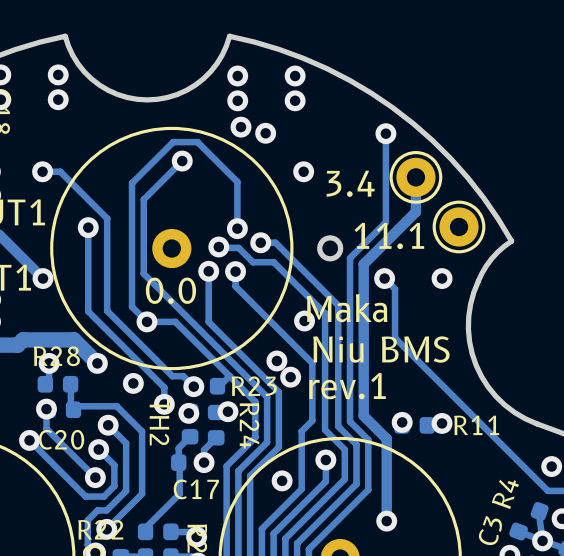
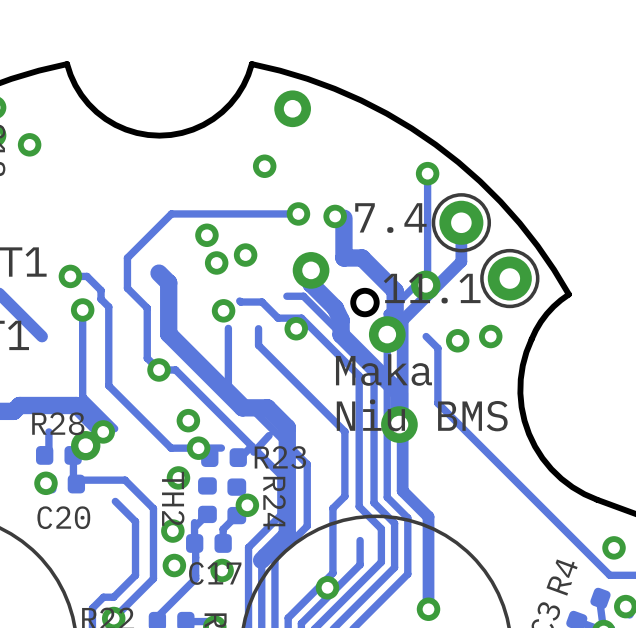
via: (58, 74) -> none
via: (237, 76) -> none
via: none -> (292, 108)
via: (295, 76) -> none
via: (58, 99) -> none
via: (237, 100) -> none
via: (295, 100) -> none
via: none -> (29, 144)
via: (265, 133) -> none
track: (182, 161) (143, 199) (143, 273) (267, 397) (267, 442) (238, 471) -> none
via: (182, 161) -> none
via: none -> (298, 213)
track: (42, 171) (60, 171) (107, 218) (107, 310) (172, 376) (183, 376) (193, 386) -> none
via: (42, 171) -> none
track: none -> (343, 218) (343, 257) (362, 257) (395, 291) (395, 326) (387, 334)
3.4 name: 3.4 (350, 183) -> 7.4 (390, 218)
via: none -> (206, 235)
via: none -> (245, 255)
via: none -> (216, 262)
track: none -> (311, 270) (311, 283) (335, 308) (341, 320) (341, 334) (399, 393) (399, 424)
via: none -> (311, 270)
track: none -> (159, 273) (168, 282) (168, 334) (242, 407) (267, 407) (287, 427) (287, 534) (261, 560)
track: none -> (70, 276) (87, 276) (101, 290) (101, 299) (108, 306) (108, 385) (171, 448) (221, 448)
track: (88, 227) (88, 311) (164, 387) (164, 404) -> none
via position: (88, 227) -> (70, 276)
track: (237, 228) (237, 181) (197, 142) (173, 142) (132, 183) (132, 306) (147, 321) (175, 321) -> (298, 213) (171, 213) (127, 257) (127, 288) (147, 308) (147, 358) (159, 369) (175, 369) (190, 385)
via: (237, 228) -> none
via: none -> (425, 285)
via: (260, 242) -> none
via: (218, 246) -> none
0.0: (171, 248) -> none
track: none -> (82, 309) (82, 396) (114, 428)
via: none -> (82, 309)
via: none -> (223, 310)
via: (208, 271) -> none
via: (235, 271) -> none
via: none -> (296, 328)
via: none -> (387, 334)
via: (43, 278) -> none
via position: (384, 278) -> (457, 340)
via position: (147, 321) -> (159, 369)
via: (304, 321) -> none
via: none -> (188, 420)
via: none -> (399, 424)
via: (276, 361) -> none
via: (49, 363) -> none
track: none -> (269, 435) (253, 452)
via: none -> (85, 445)
via: (290, 377) -> none
via: (133, 383) -> none
via position: (193, 386) -> (198, 448)
text: rev.1 (347, 386) -> none
track: (46, 409) (46, 428) (95, 477) -> none
via position: (227, 411) -> (247, 505)
via: (188, 413) -> none
via: (402, 422) -> none
via: (442, 423) -> none
via: (108, 425) -> none
R11: (414, 425) -> none
track: (29, 440) (85, 496) (103, 496) (114, 486) (114, 465) (98, 449) -> none
via: (29, 440) -> none
via: (98, 449) -> none
via: none -> (172, 531)
via: (325, 460) -> none
via: (204, 462) -> none
via: (95, 477) -> none
via: (282, 480) -> none
via: none -> (174, 565)
via: none -> (222, 570)
via: none -> (327, 587)

